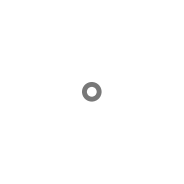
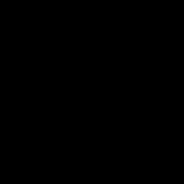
via: (91, 91) -> none

